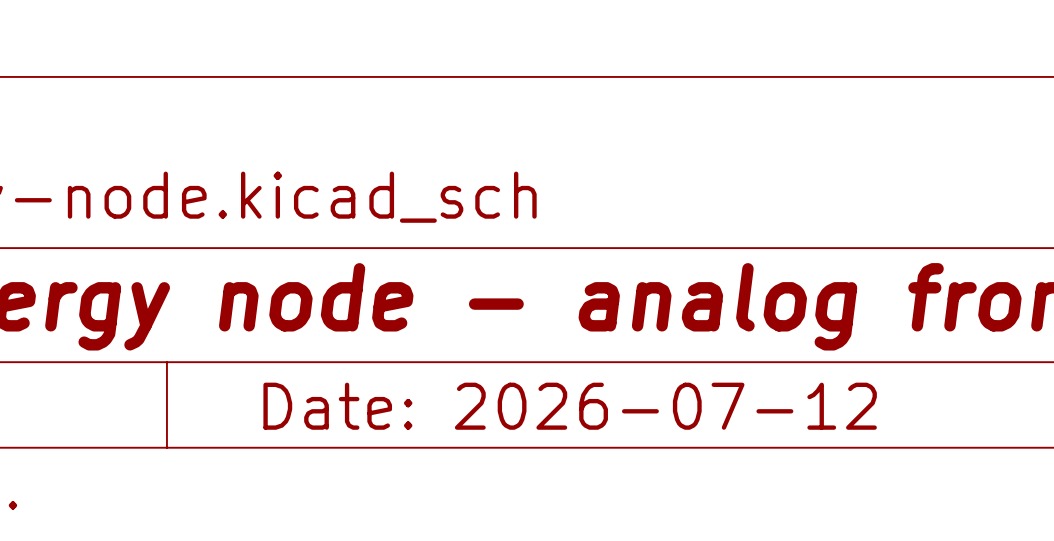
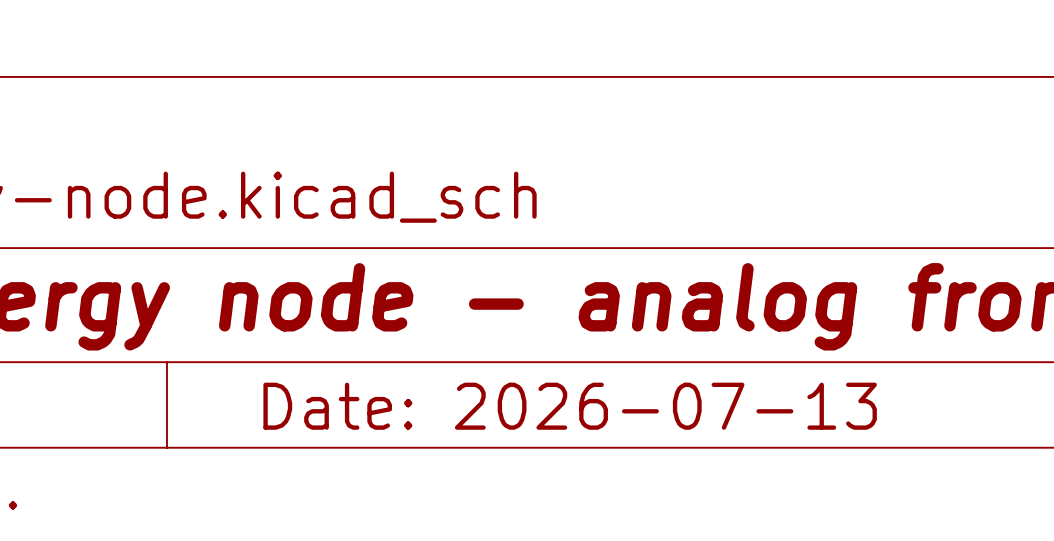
title block: Date: 2026-07-12 (570, 406) -> Date: 2026-07-13 (570, 406)

